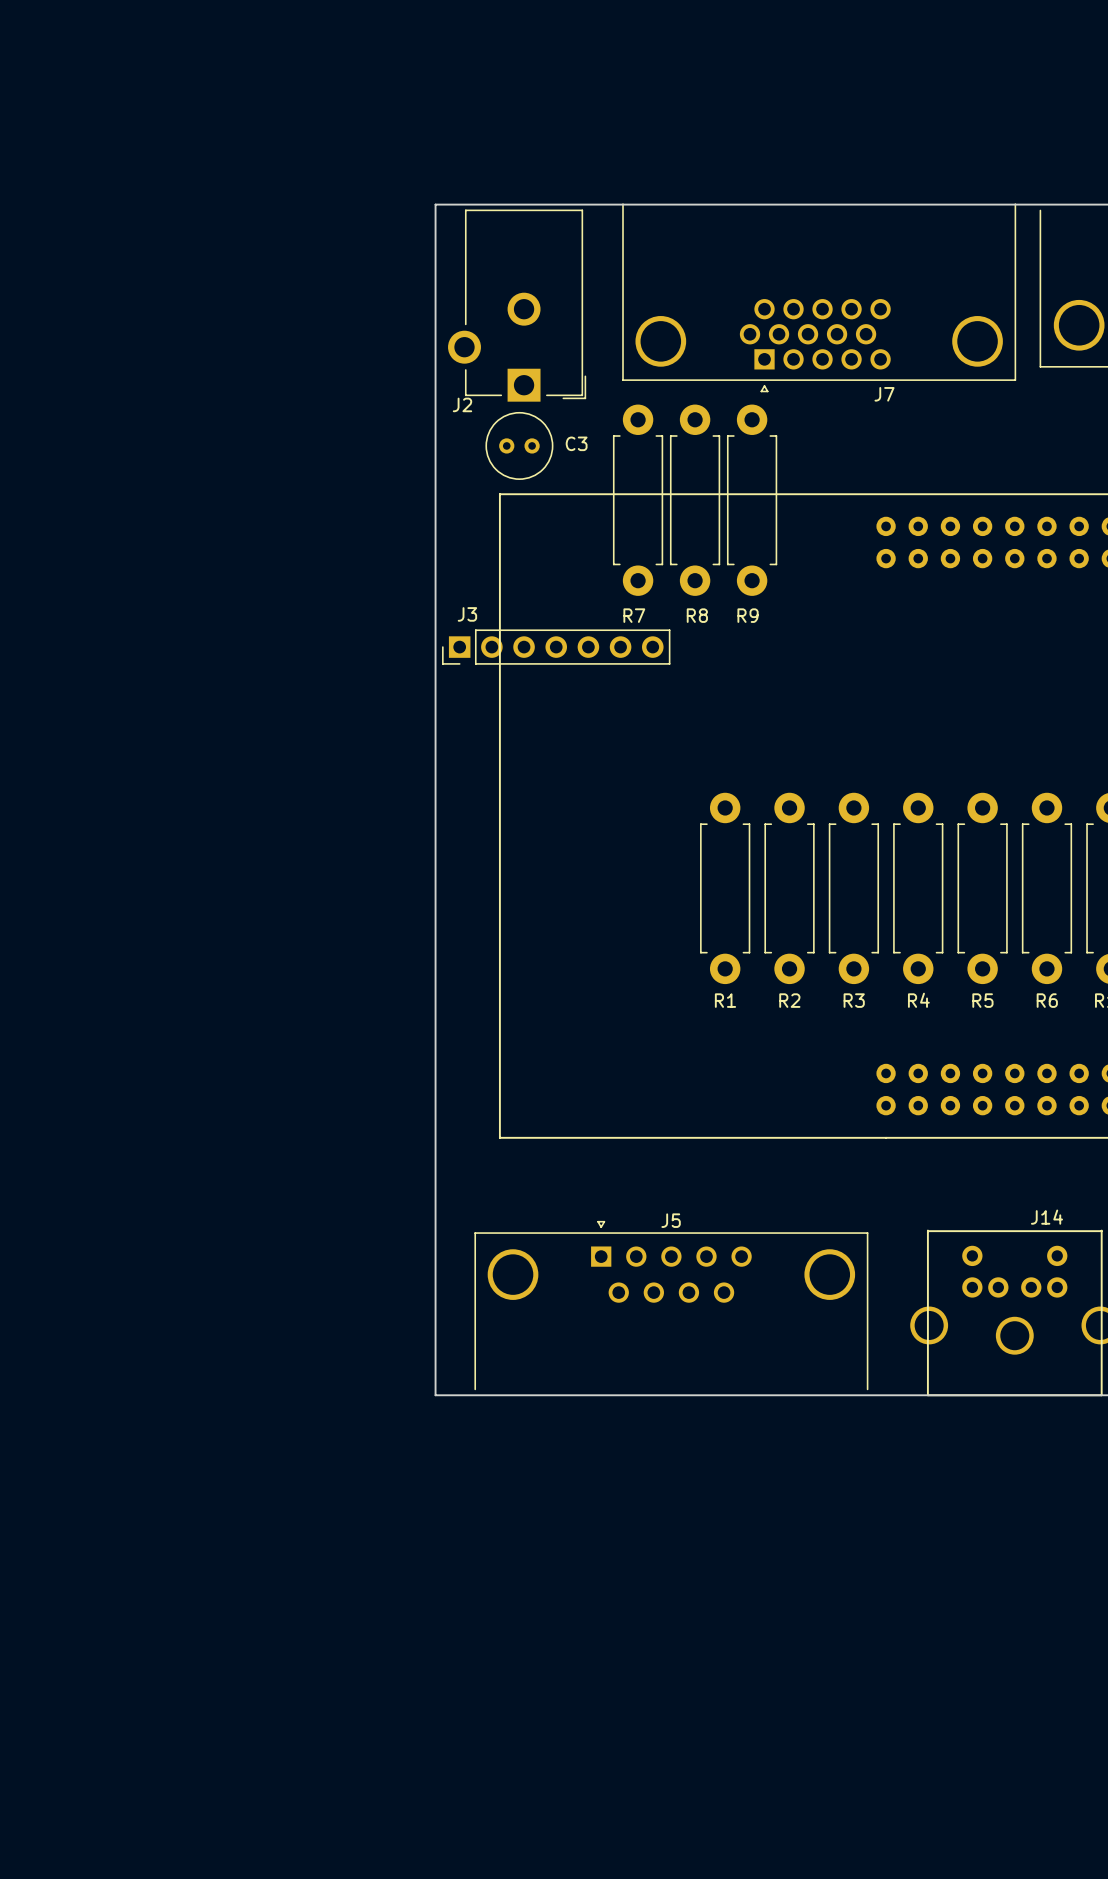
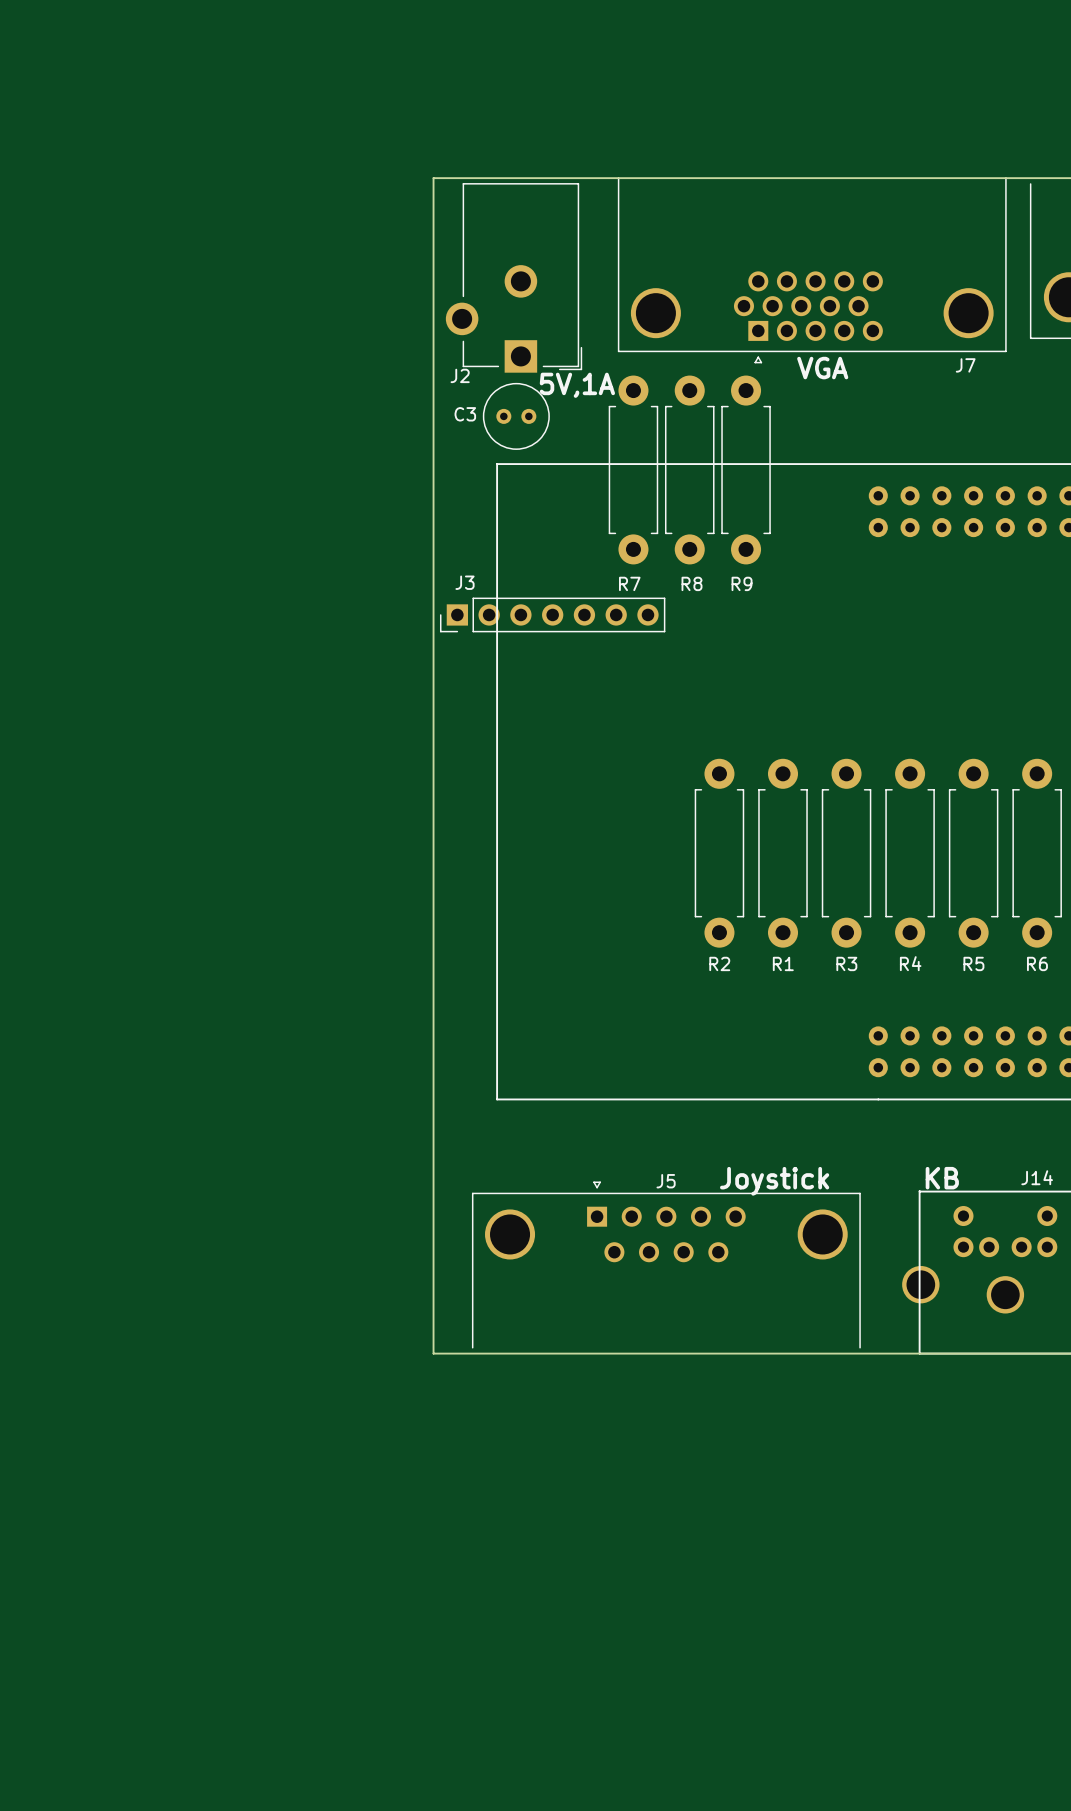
J7 name position: J7 (884, 394) -> J7 (965, 365)
text: none -> VGA (822, 368)
text: none -> 5V,1A (577, 385)
C3 name position: C3 (576, 443) -> C3 (465, 414)
R1 name: R1 (725, 1000) -> R2 (719, 963)
R2 name: R2 (789, 1000) -> R1 (783, 963)
text: none -> KB (942, 1178)
text: none -> Joystick (774, 1181)

